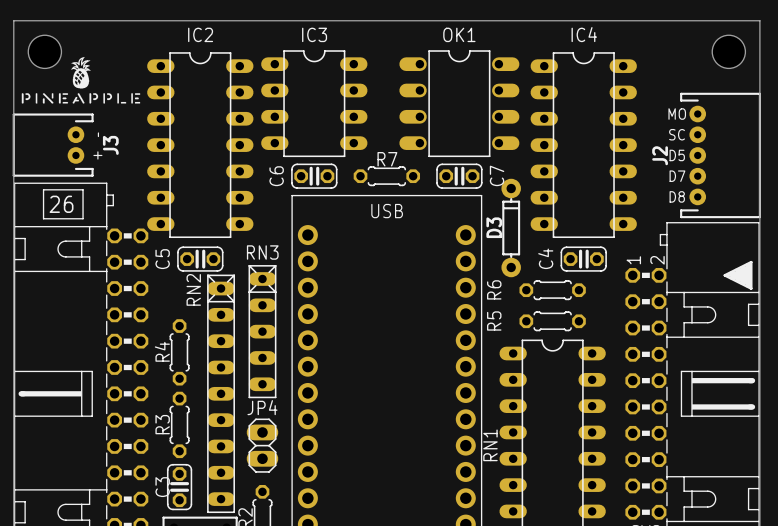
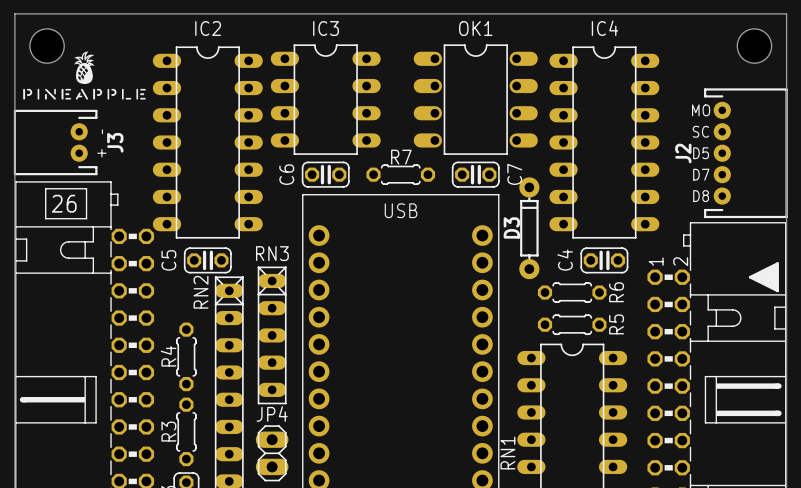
R6 name position: R6 (494, 289) -> R6 (616, 292)
R5 name position: R5 (494, 320) -> R5 (616, 324)

